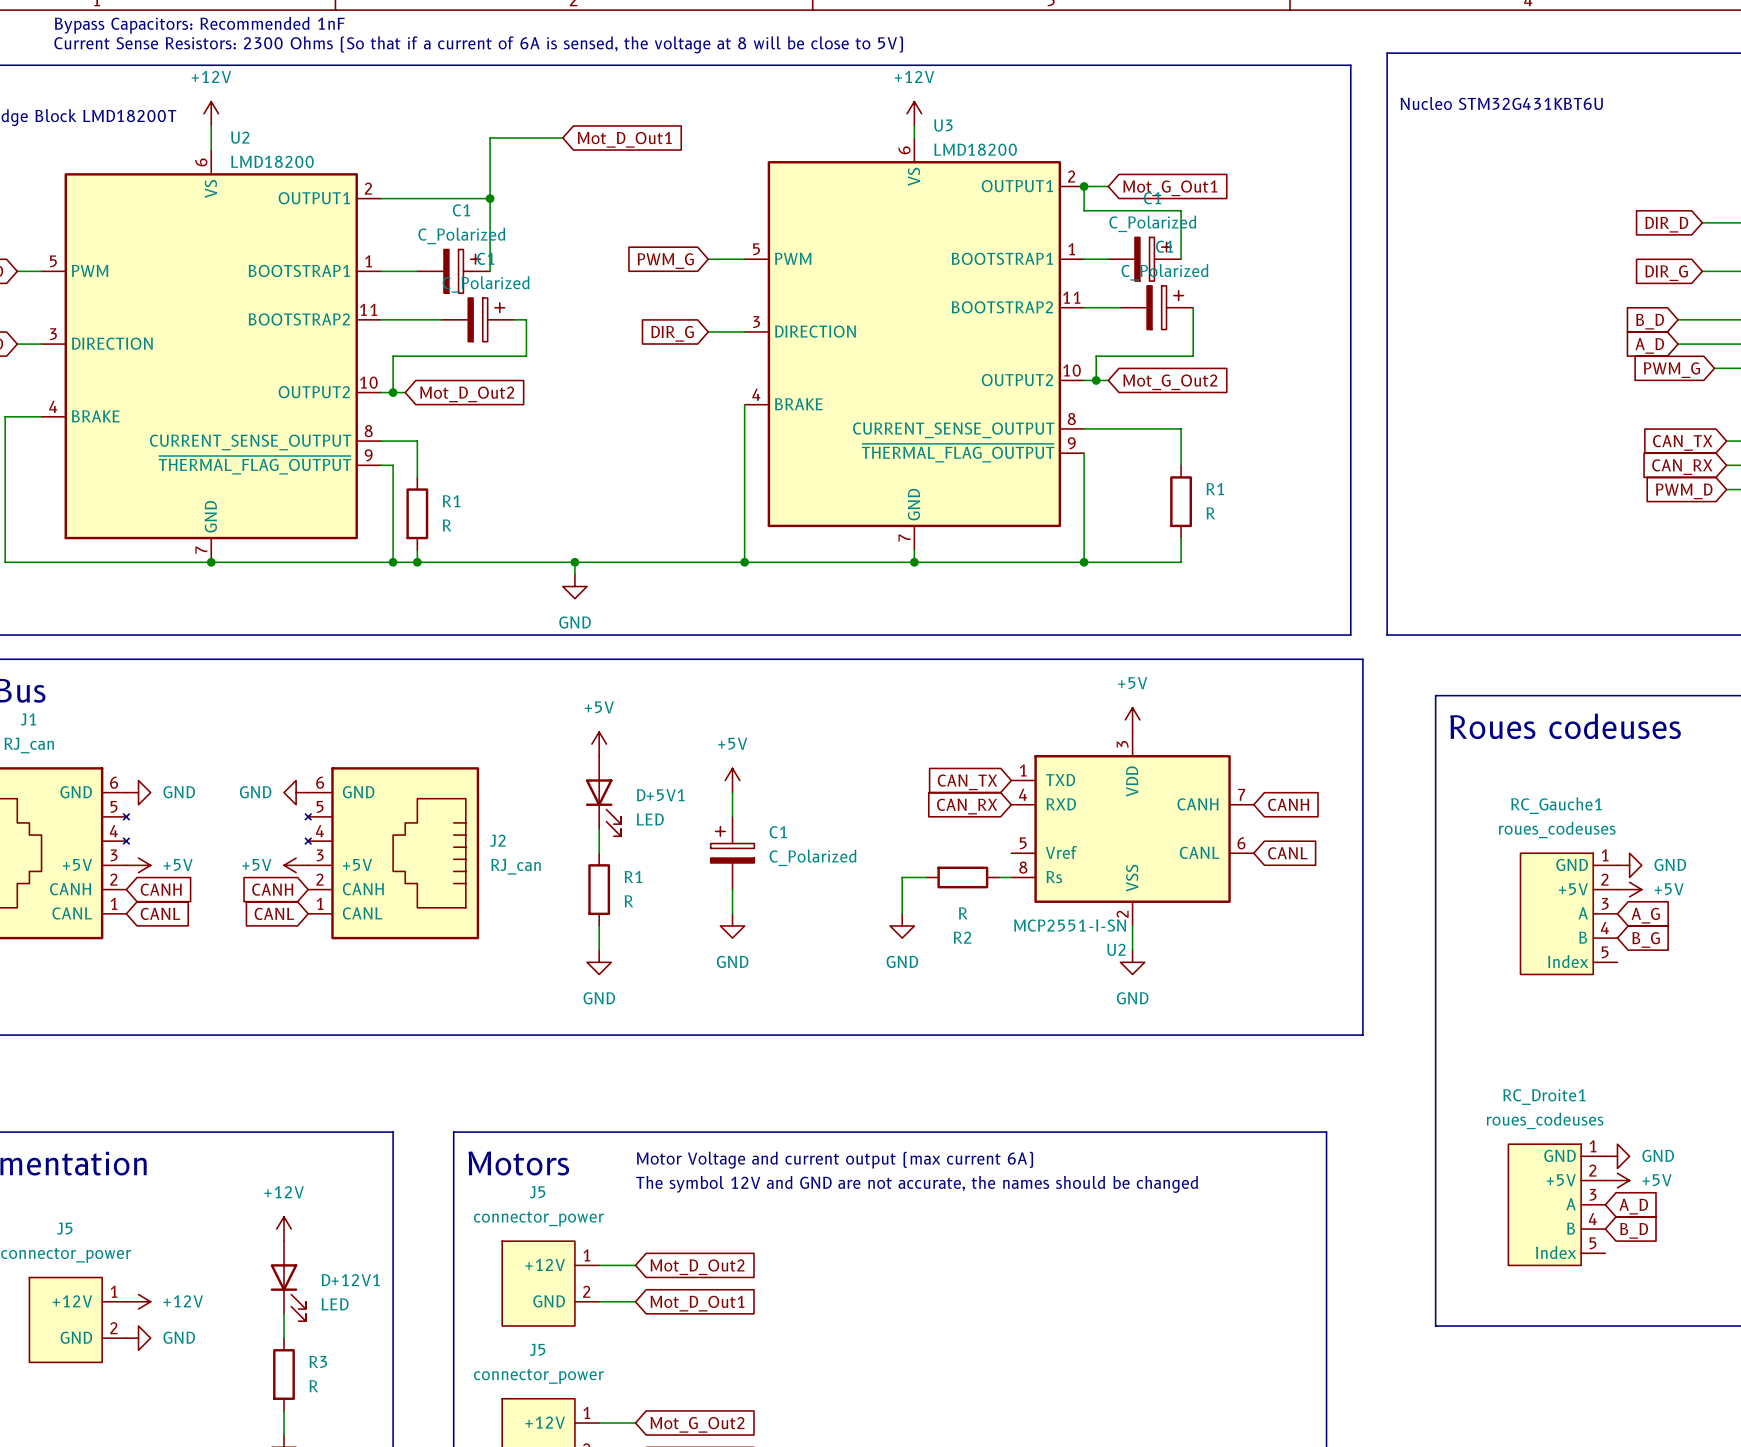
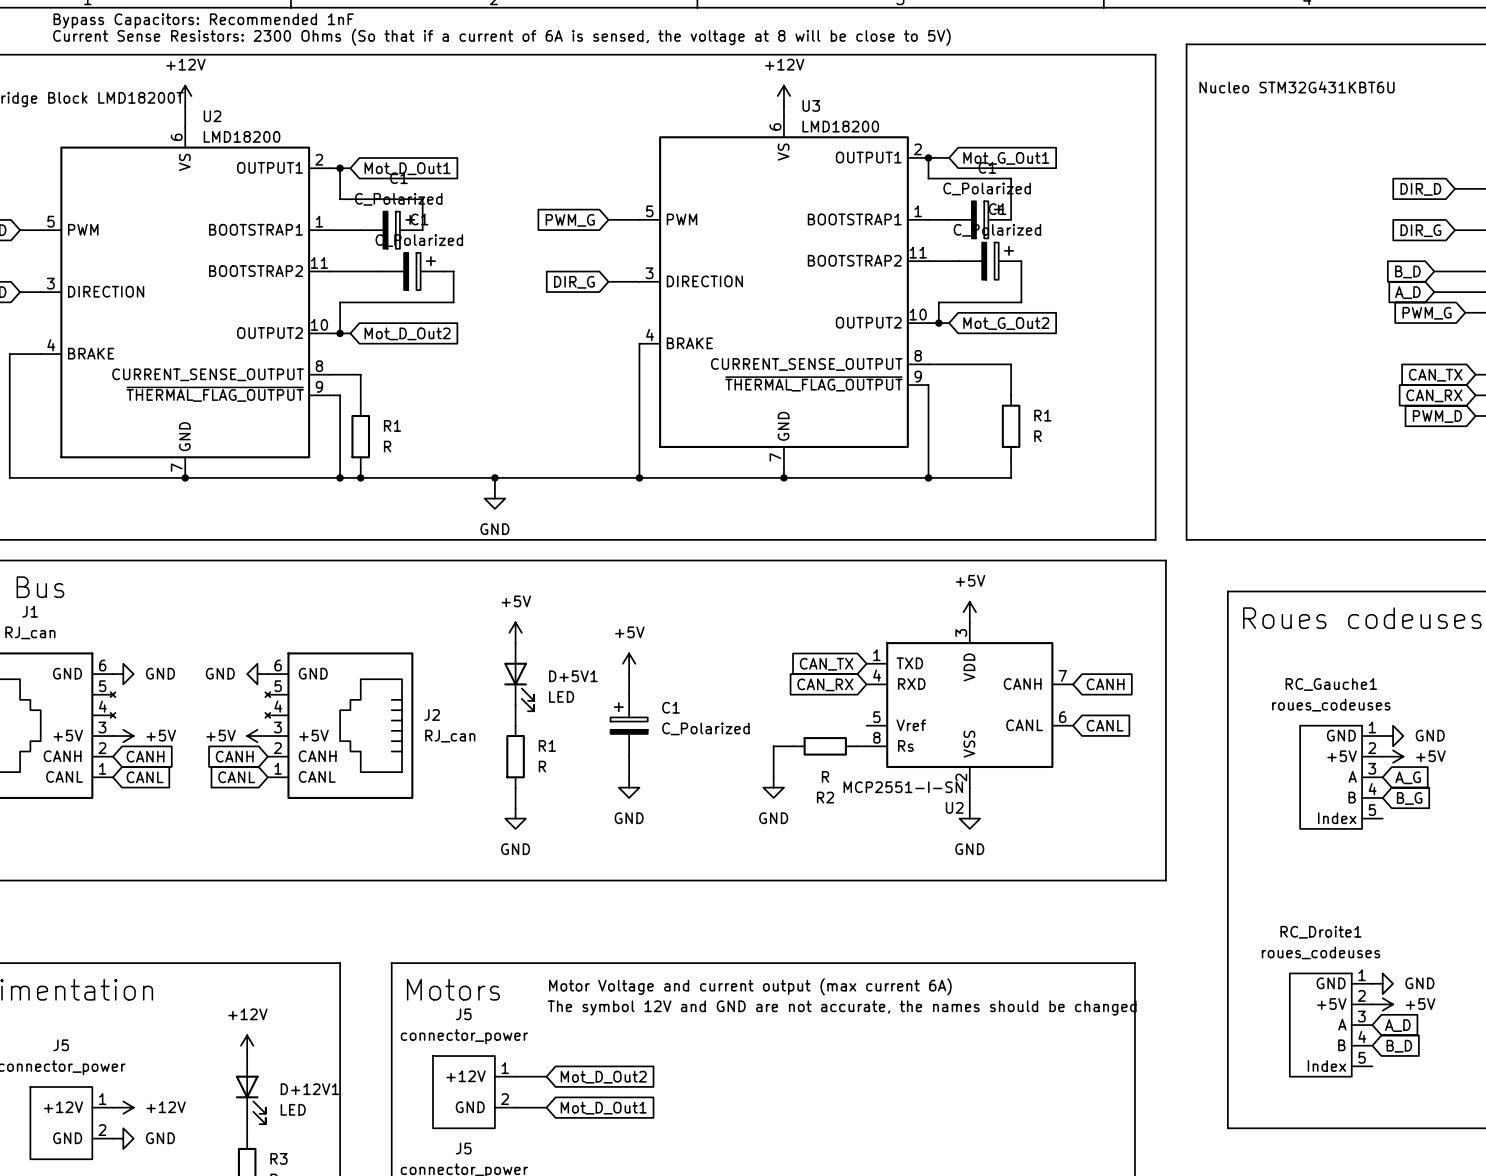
wire: (562, 138) (490, 138) (490, 234) -> (340, 168) (340, 199) (422, 199)
global label position: Mot_D_Out1 (624, 139) -> Mot_D_Out1 (407, 168)
junction: none -> (340, 168)
wire: (405, 198) (490, 198) -> none
junction: (490, 198) -> none

